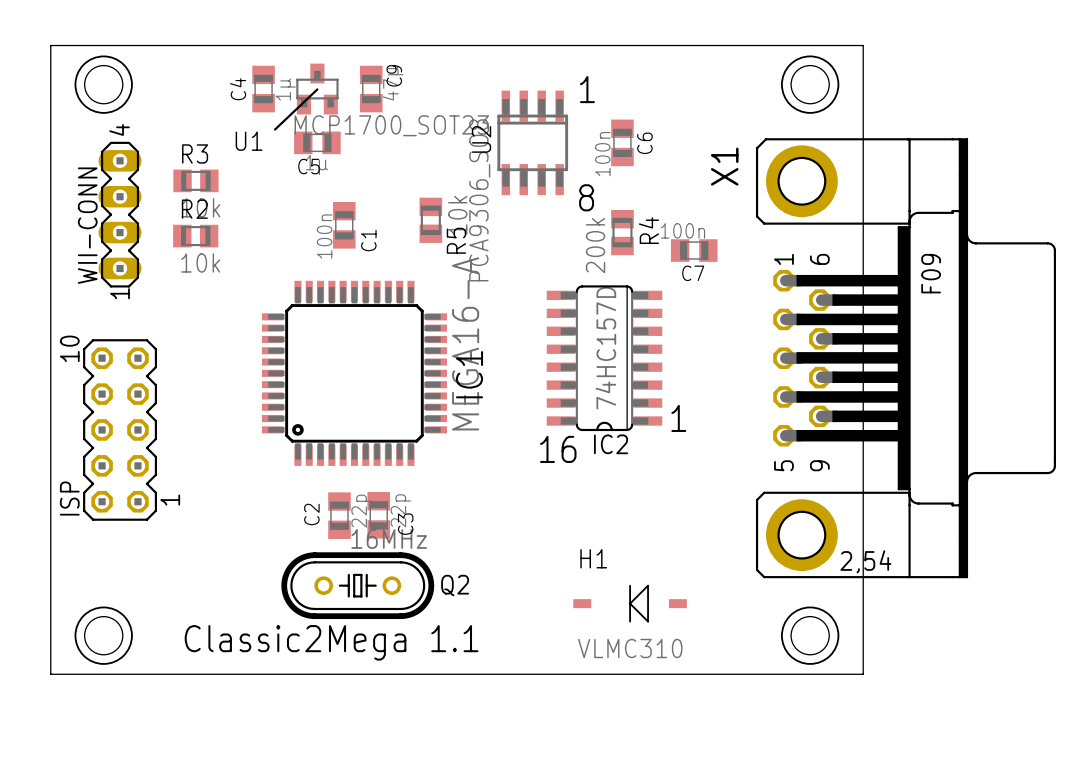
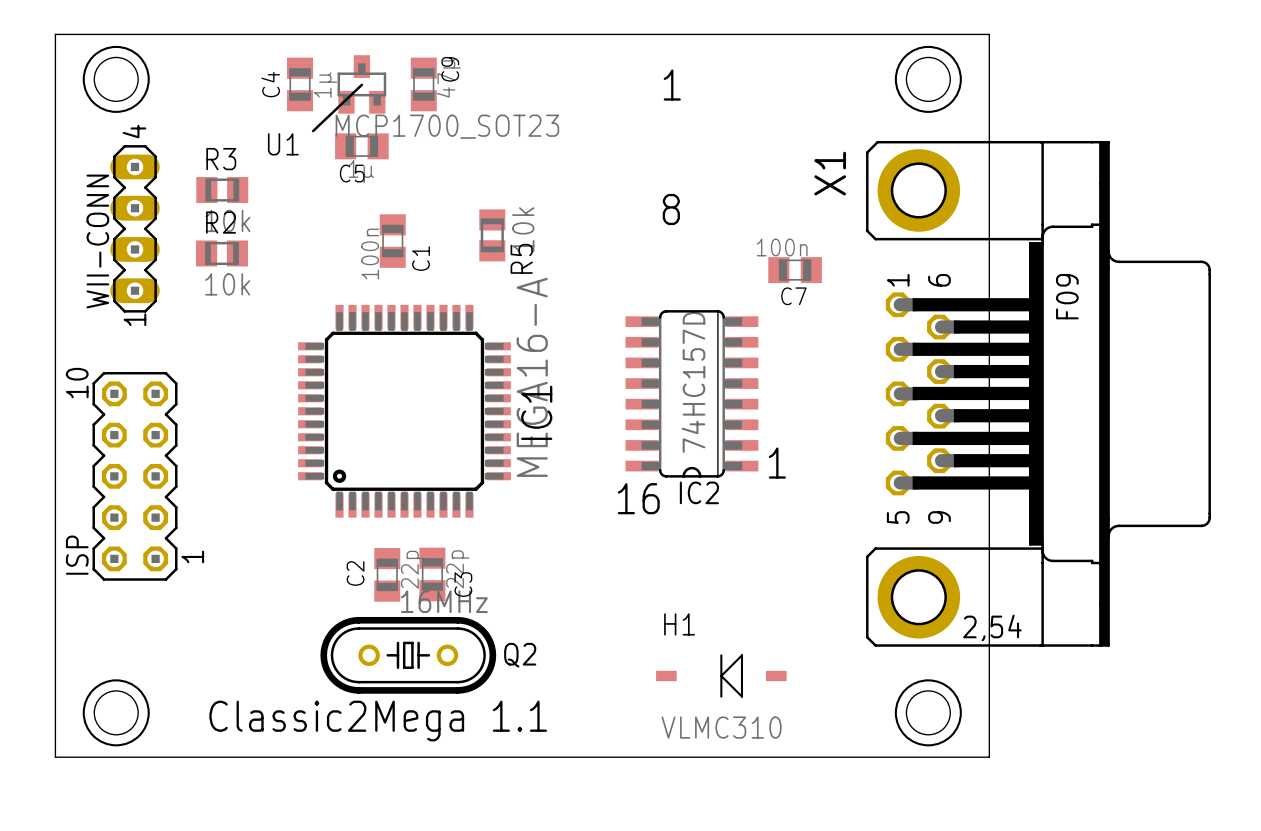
U2: PCA9306_SO8 (532, 142) -> none
C6: 100n (622, 142) -> none
R4: 200k (622, 232) -> none

